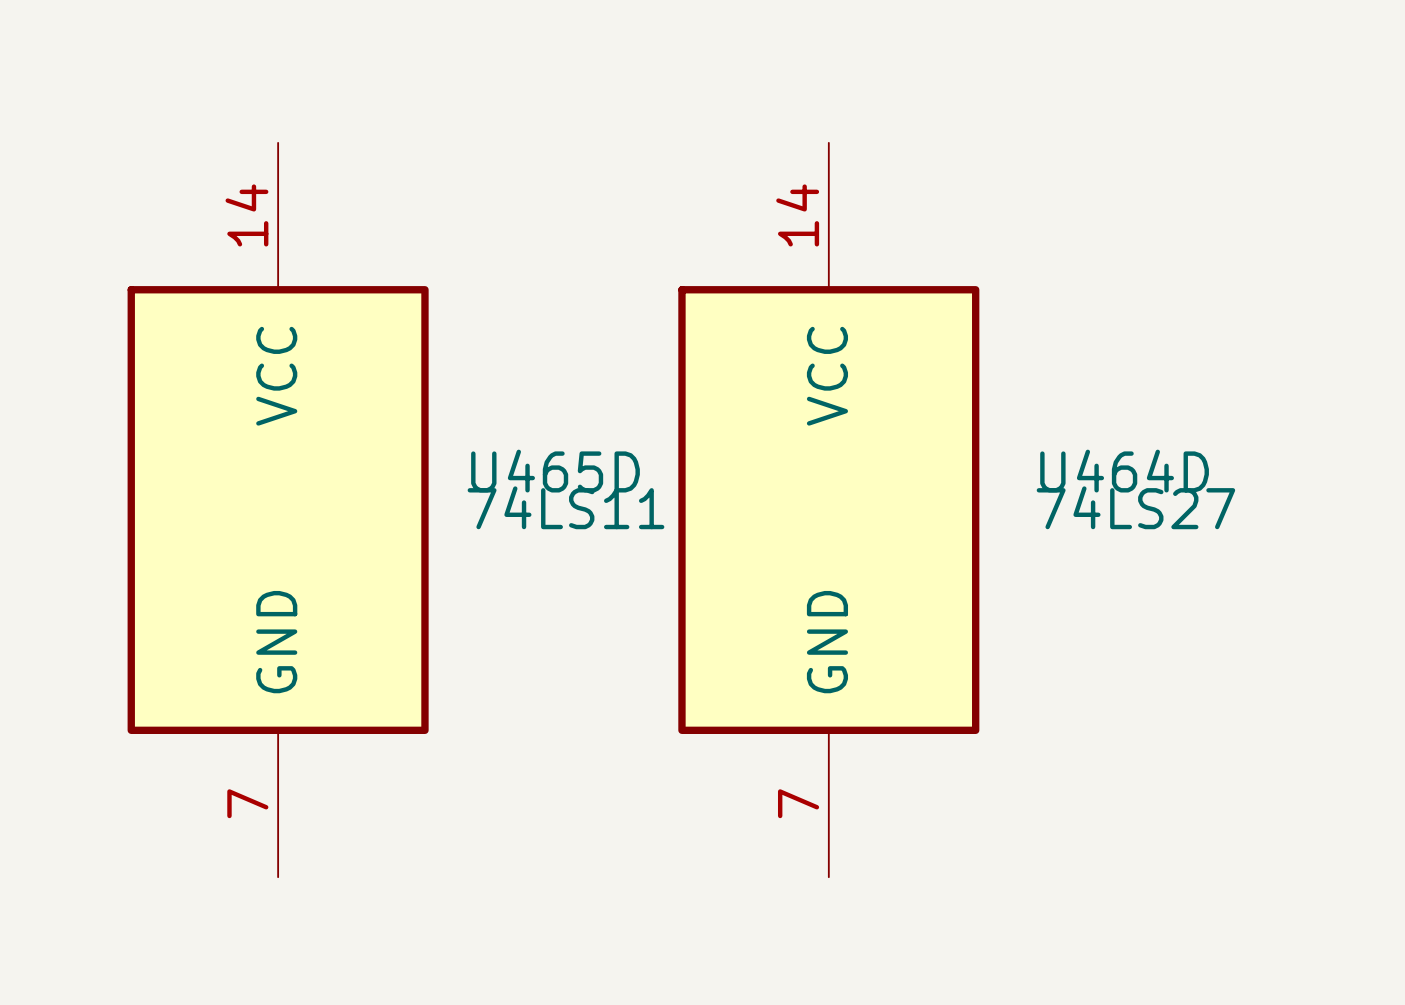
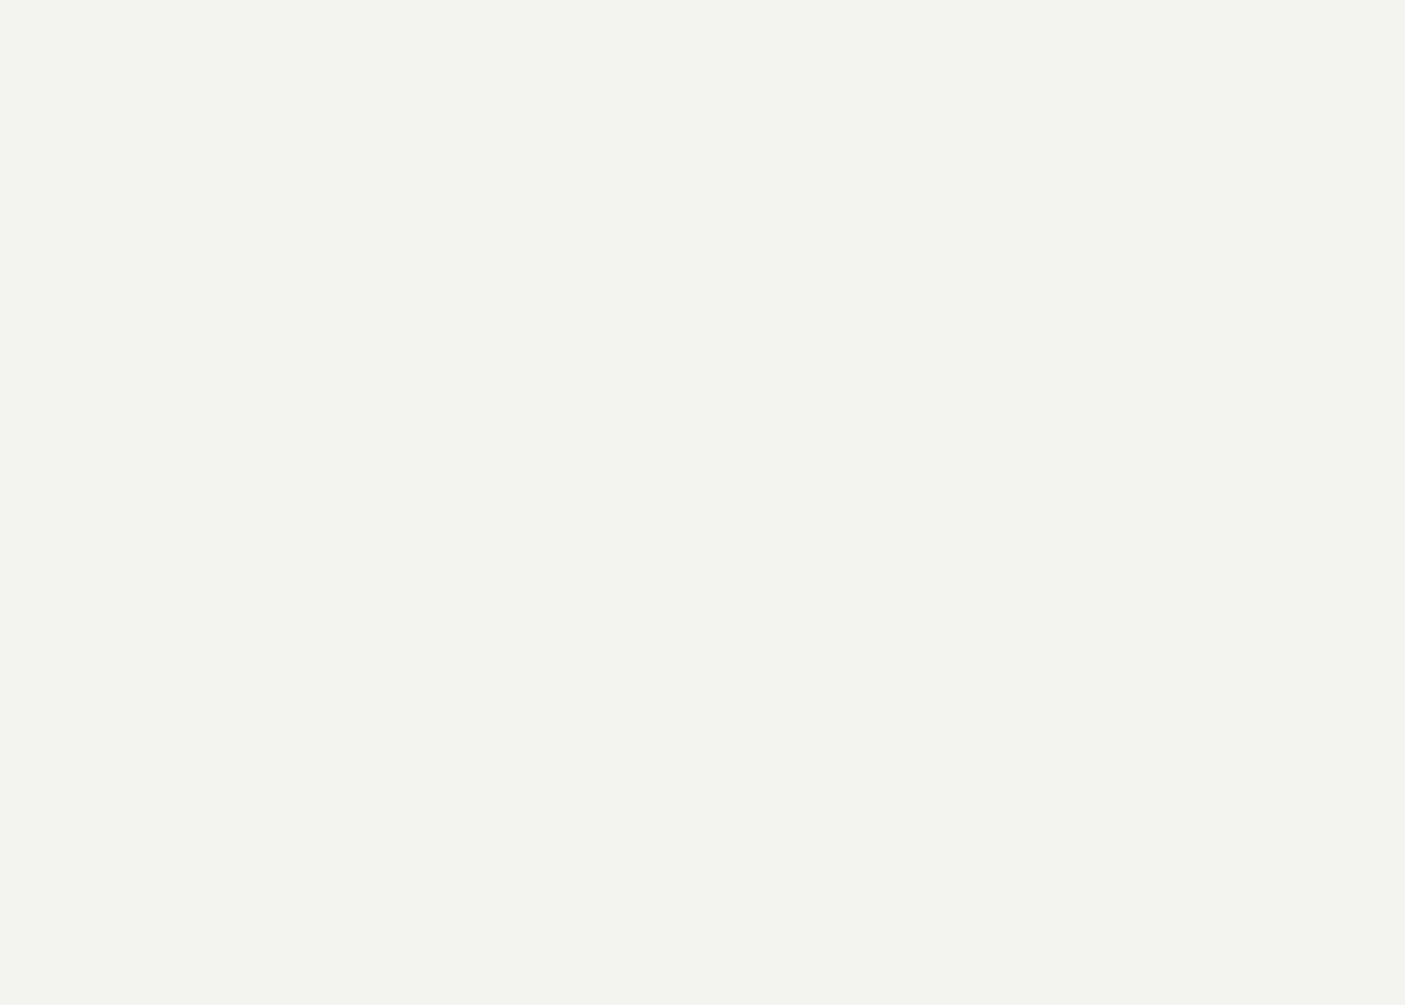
U465D: 74LS11 (278, 510) -> none
U464D: 74LS27 (828, 510) -> none

